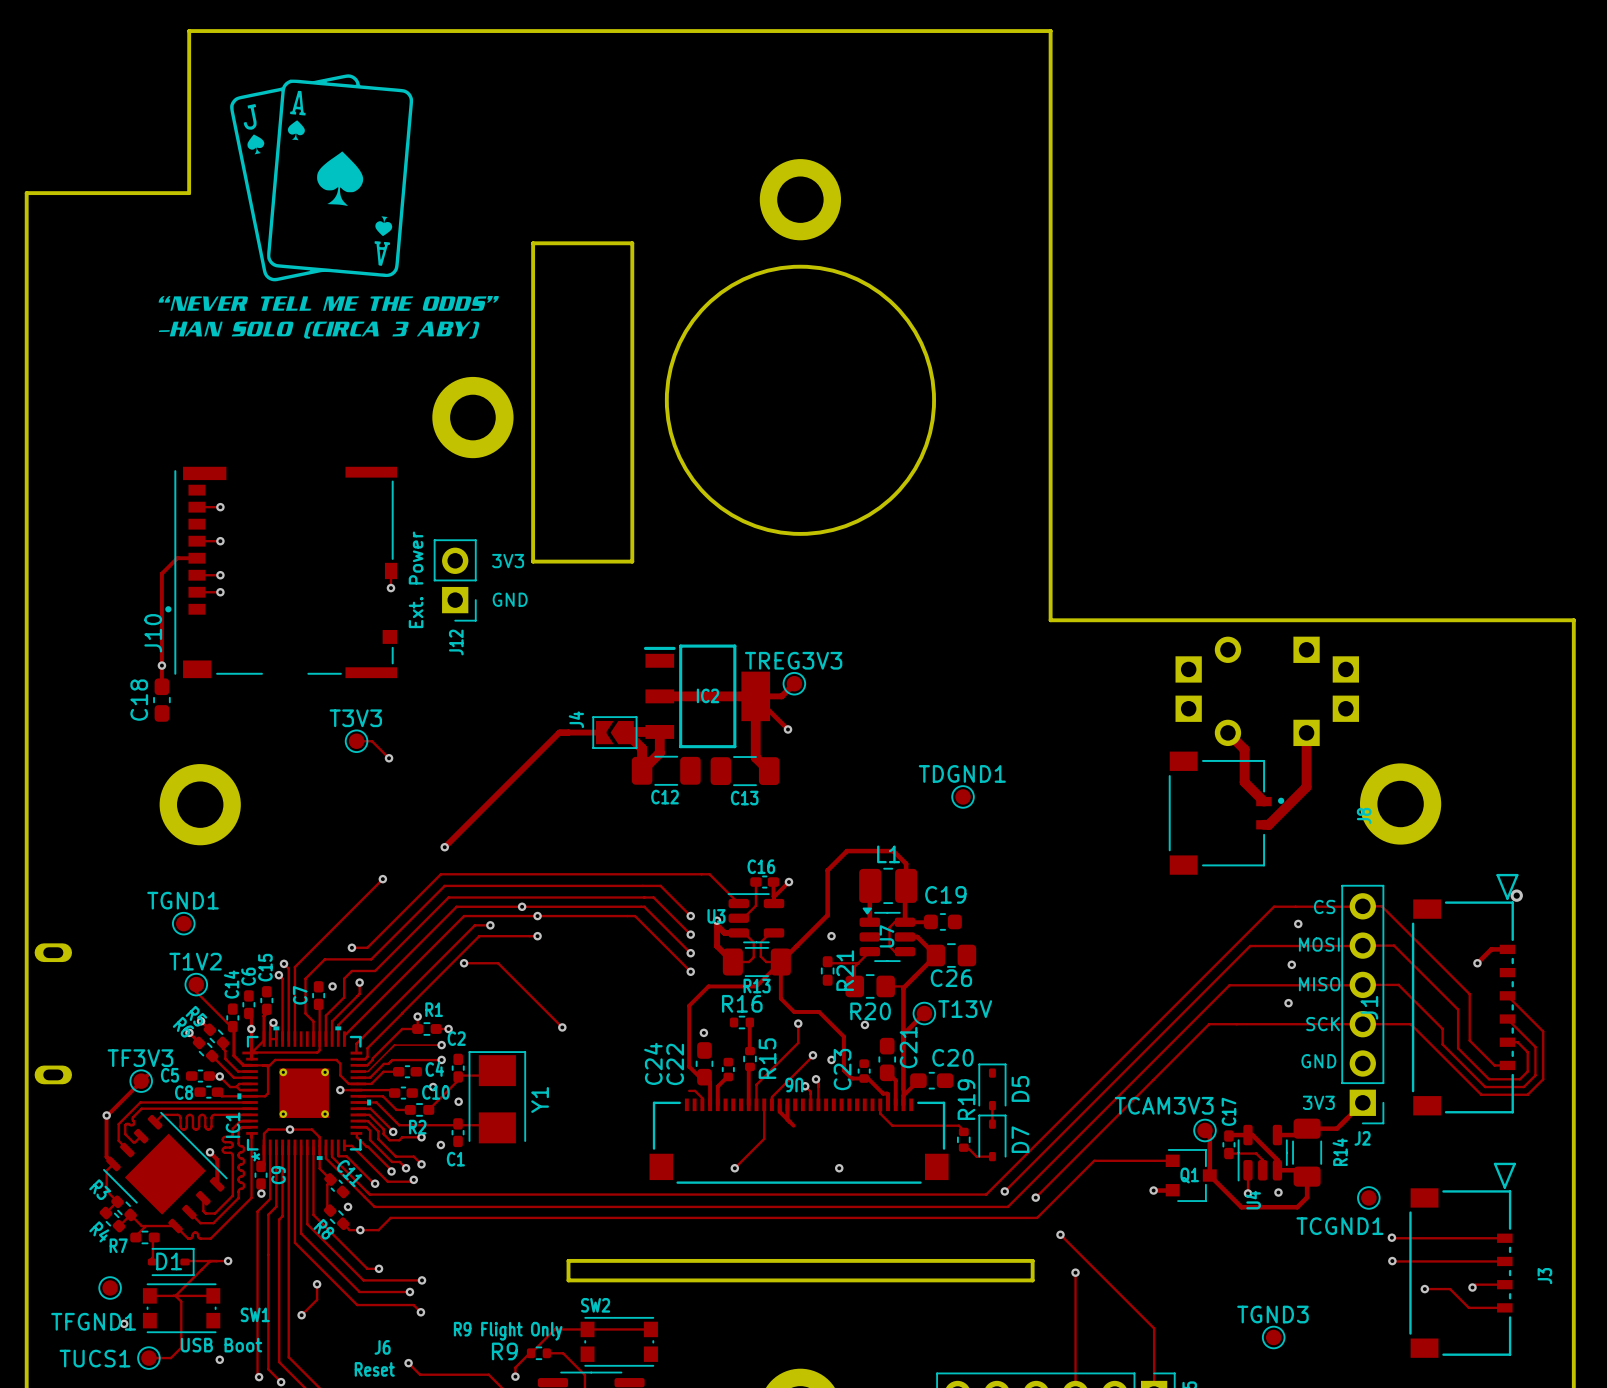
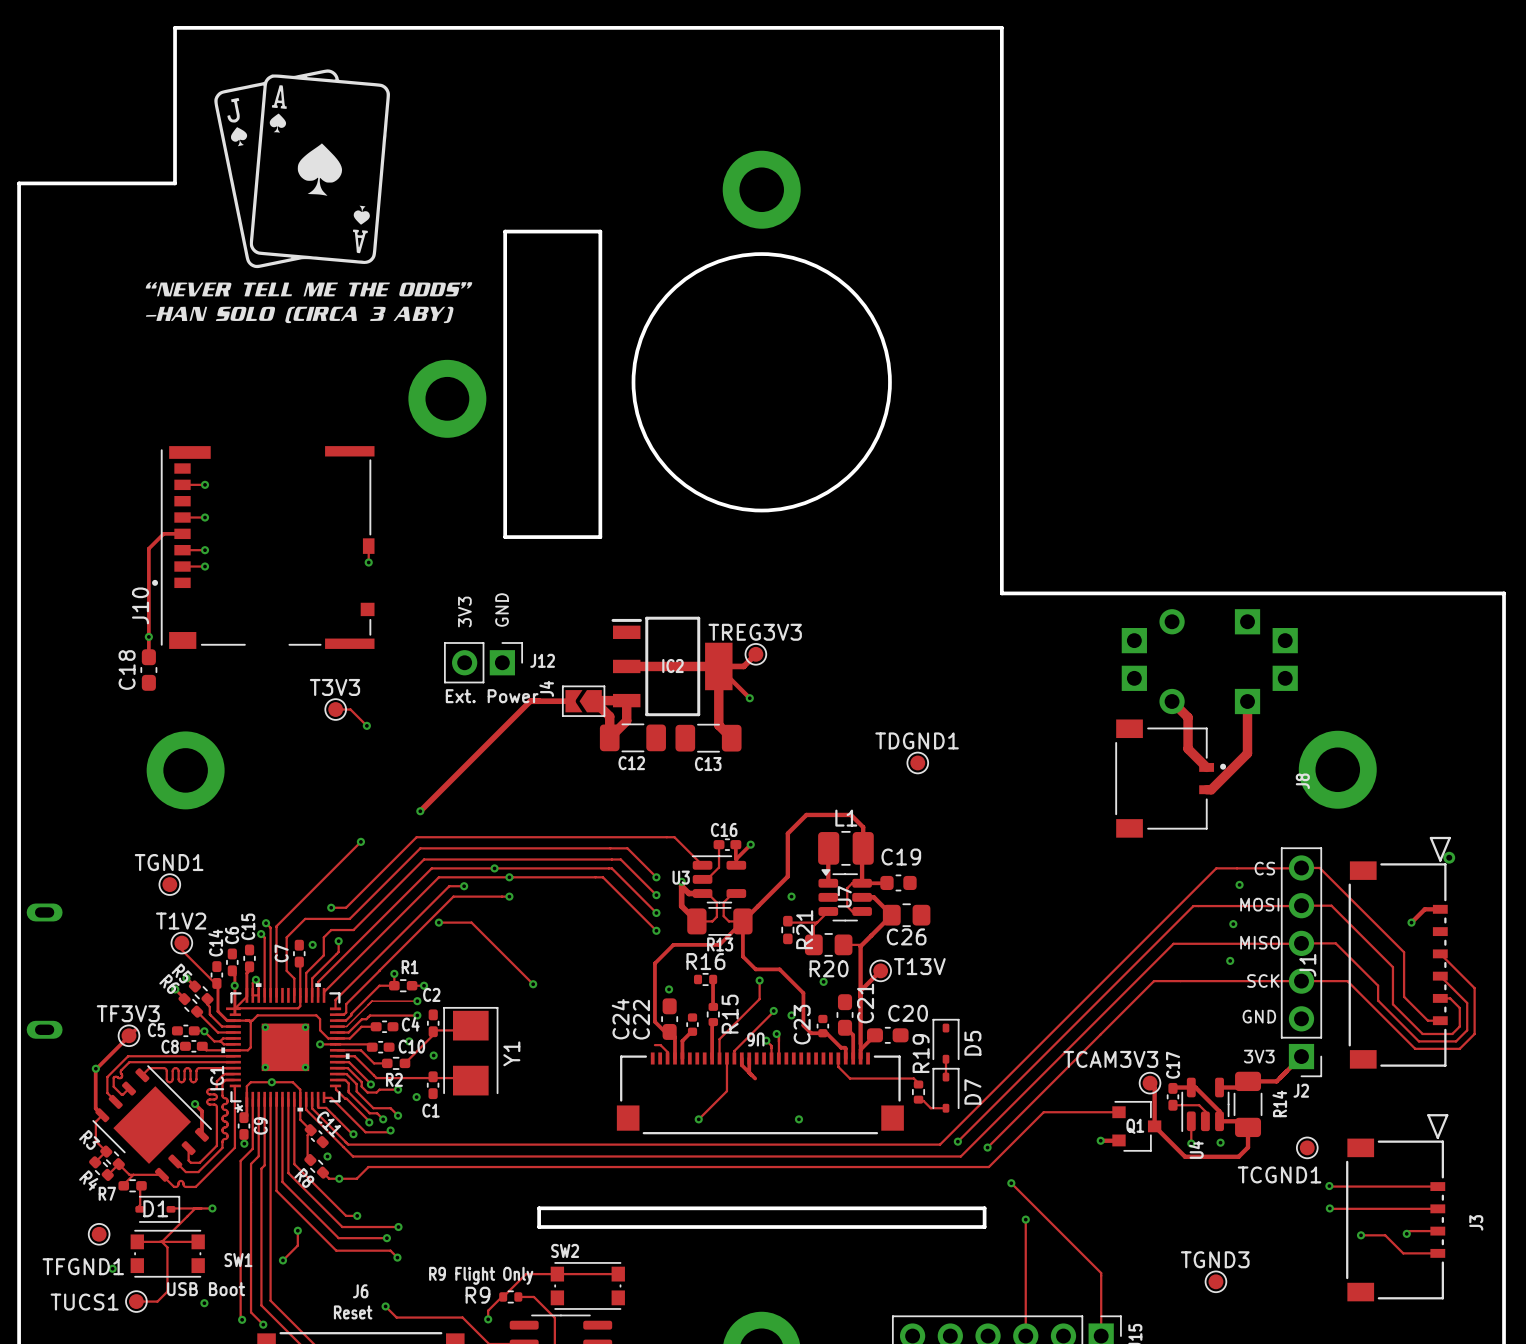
text rotation: 0° (508, 561) -> 90° counterclockwise (464, 611)
text position: 3V3 (508, 561) -> 3V3 (464, 611)
text rotation: 0° (416, 579) -> 90° clockwise (492, 696)
text position: Ext. Power (416, 579) -> Ext. Power (492, 696)
J12 rotation: 0° (455, 580) -> 90° counterclockwise (483, 662)
J12 position: (455, 580) -> (483, 662)
text rotation: 0° (510, 599) -> 90° counterclockwise (502, 610)

